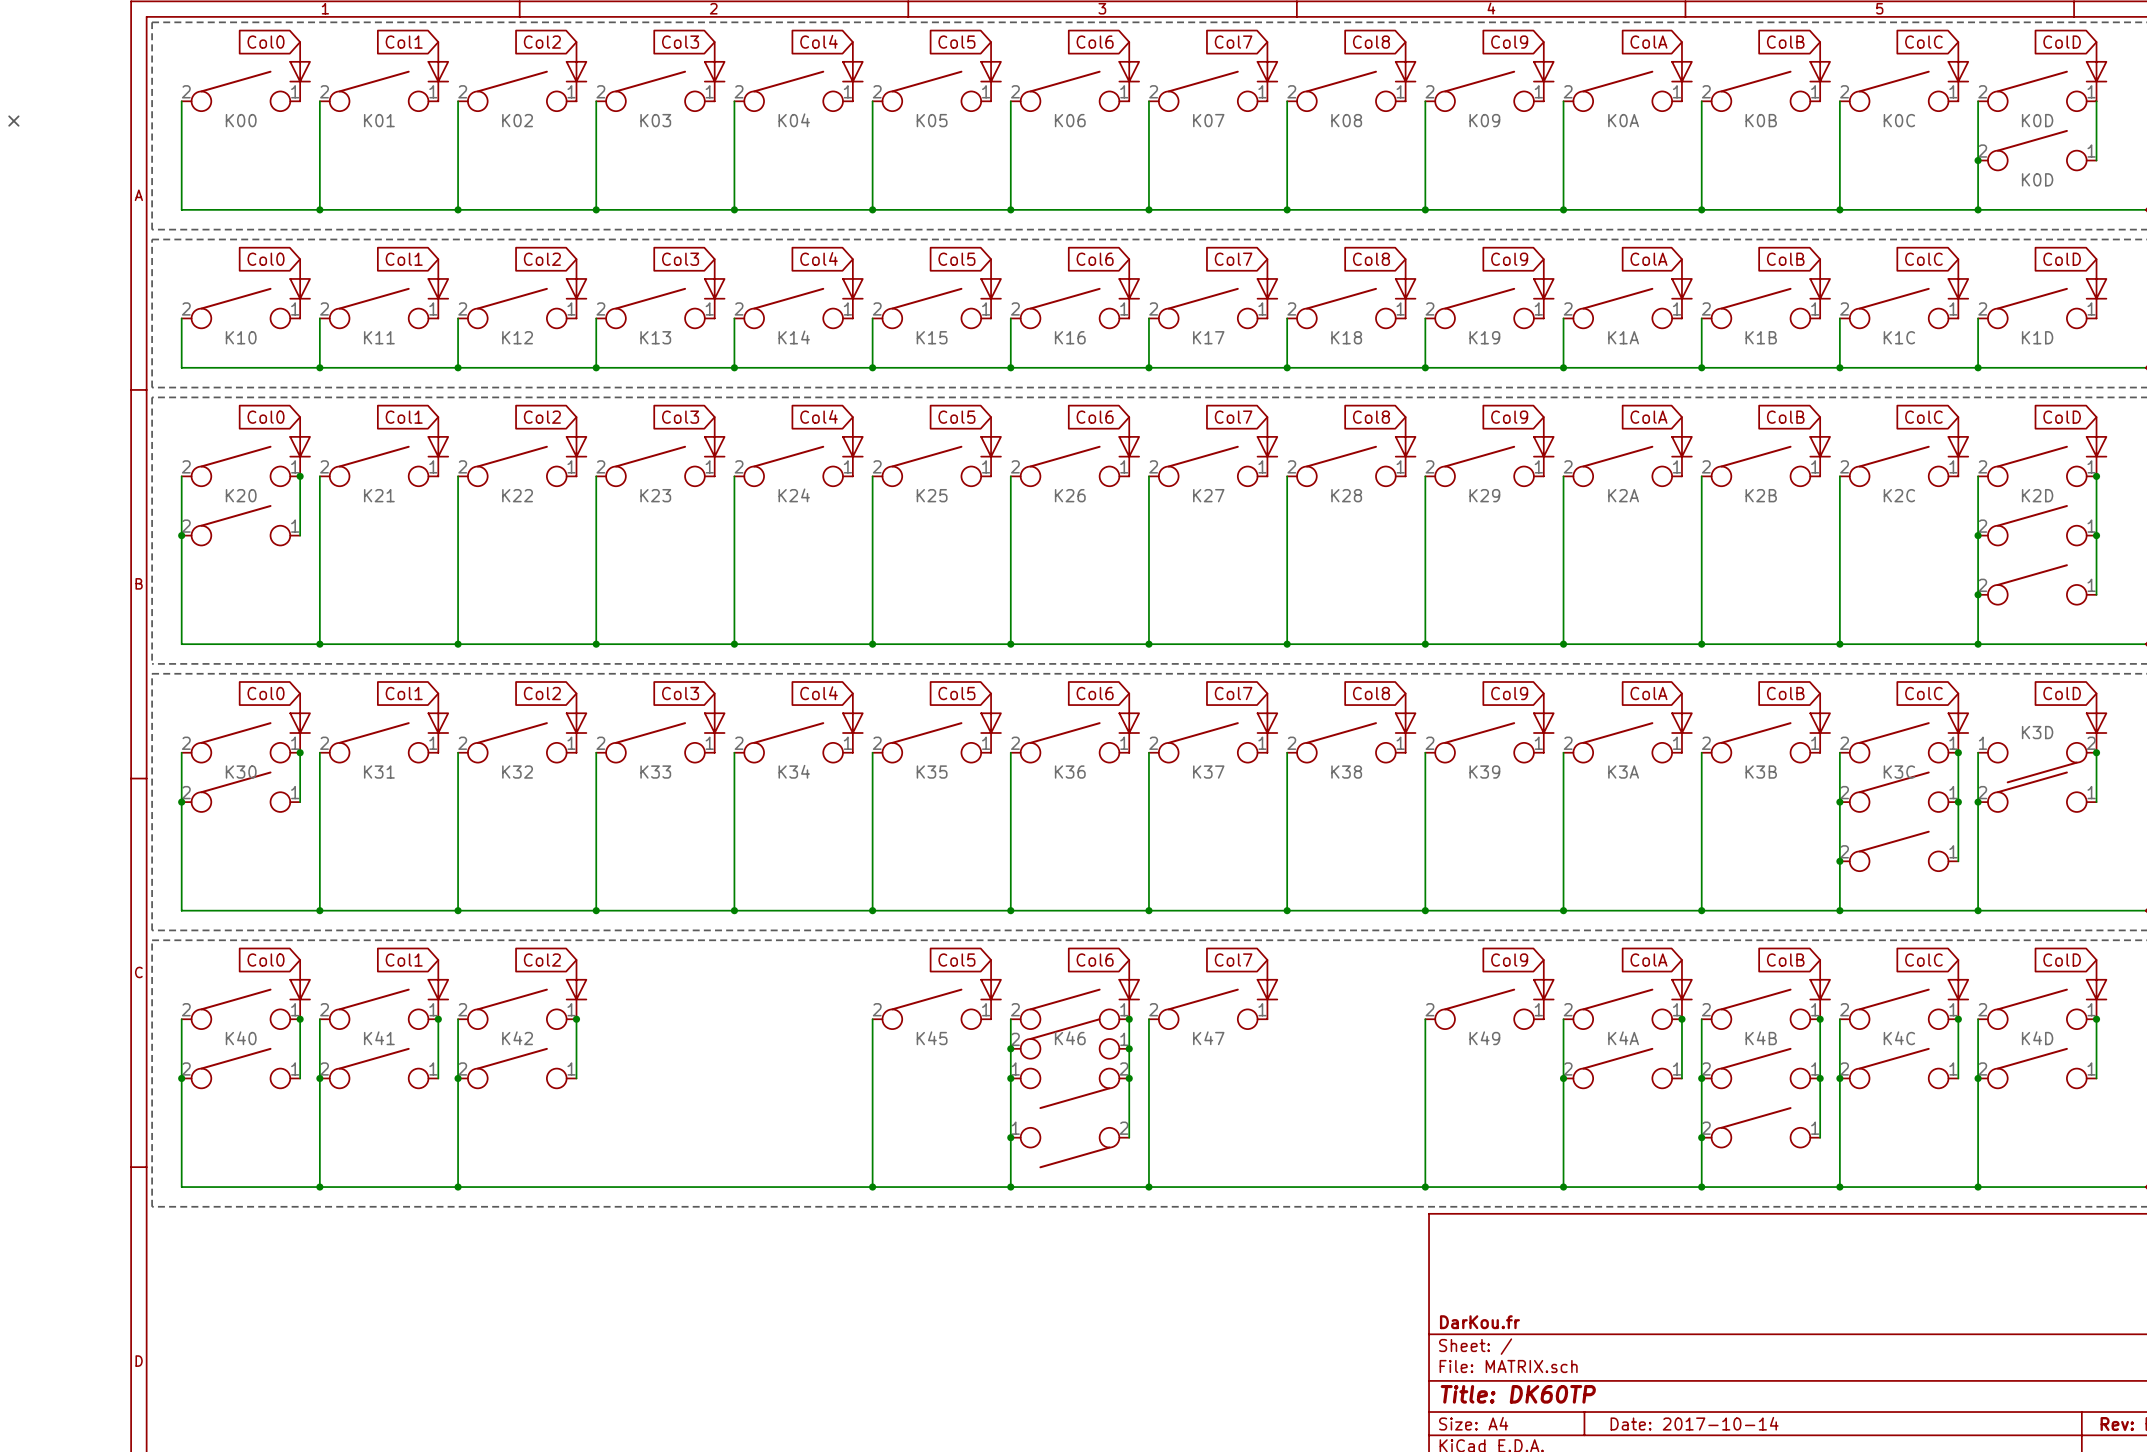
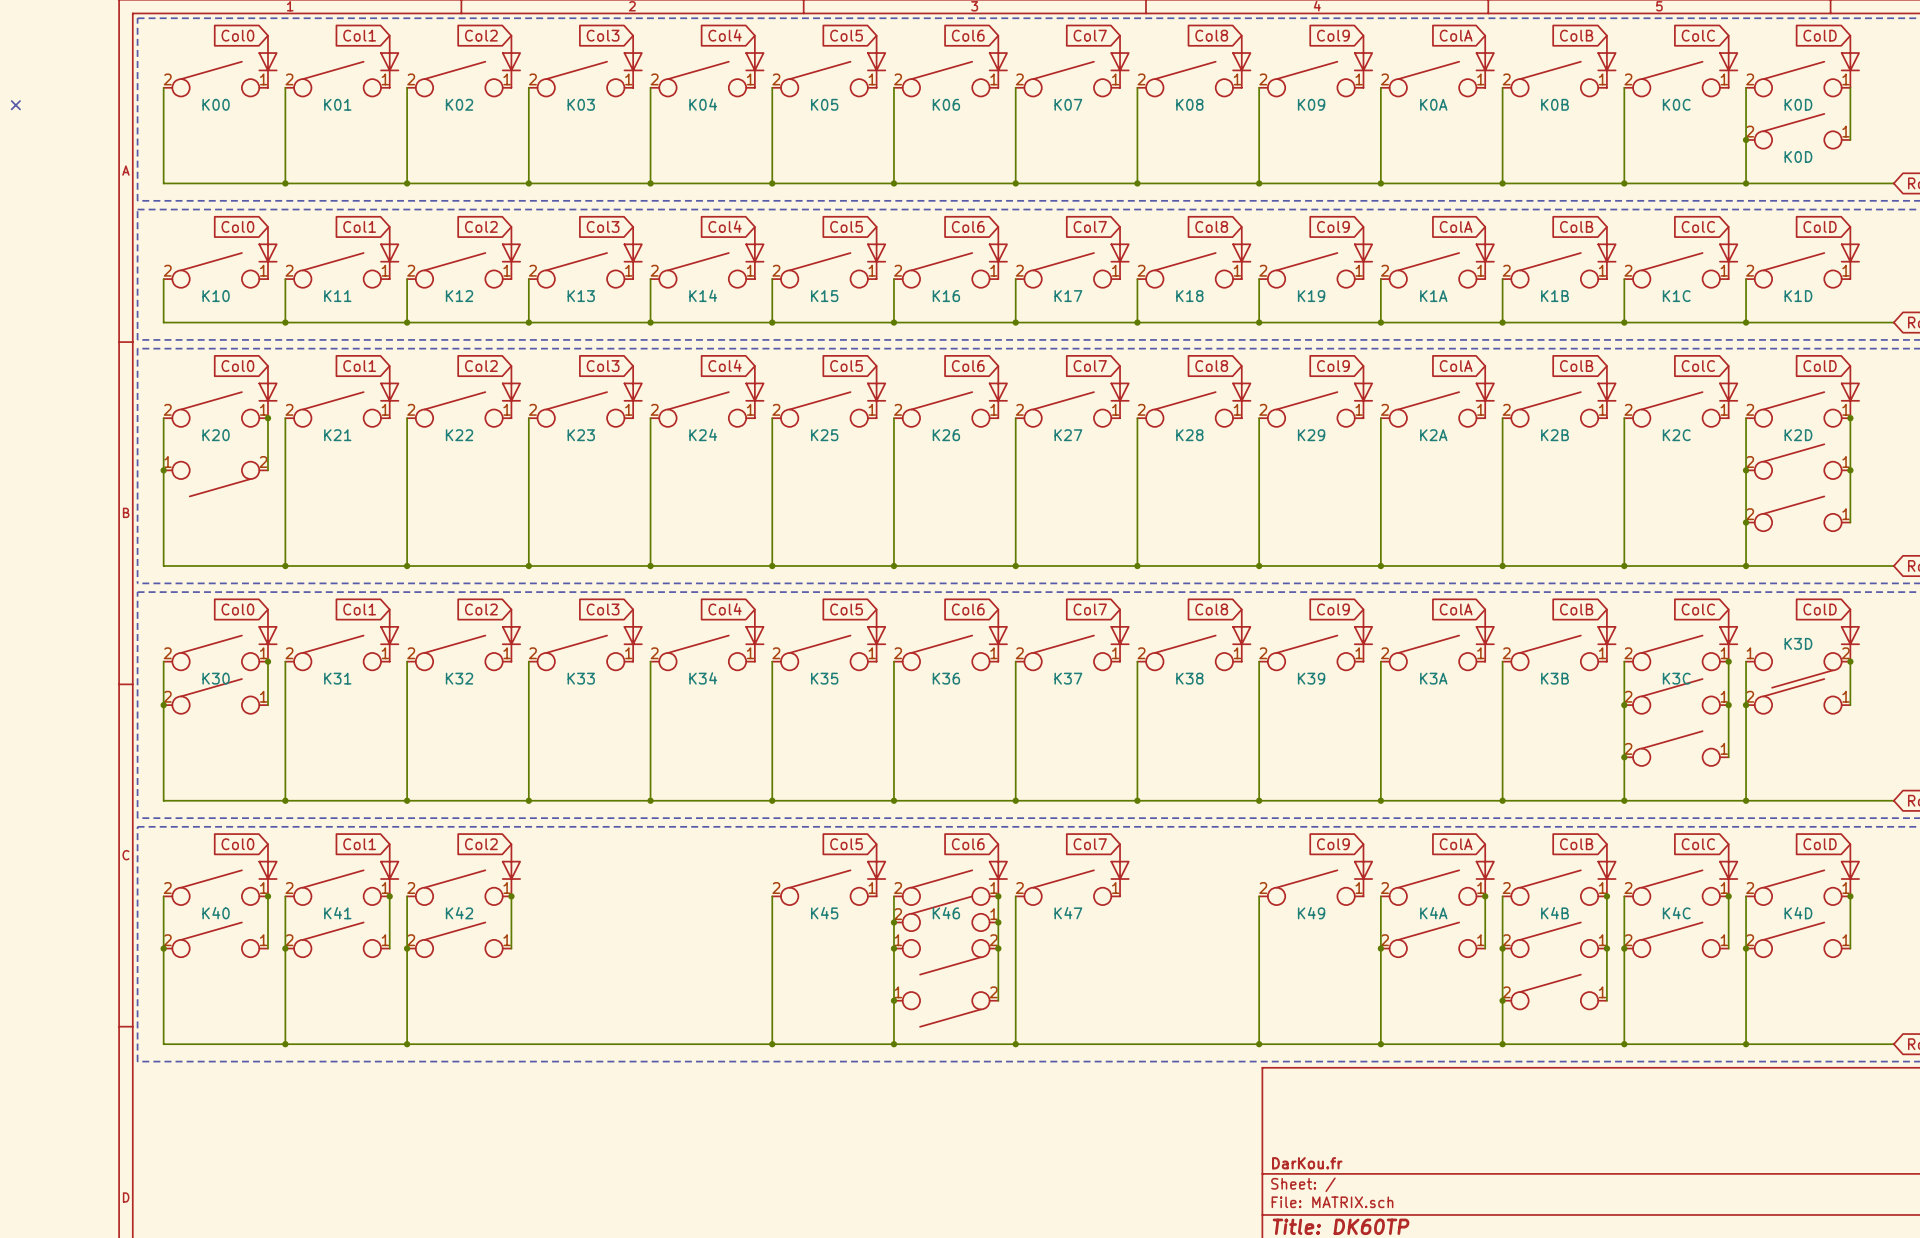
part rotation: 0° (240, 525) -> 180° (215, 479)

